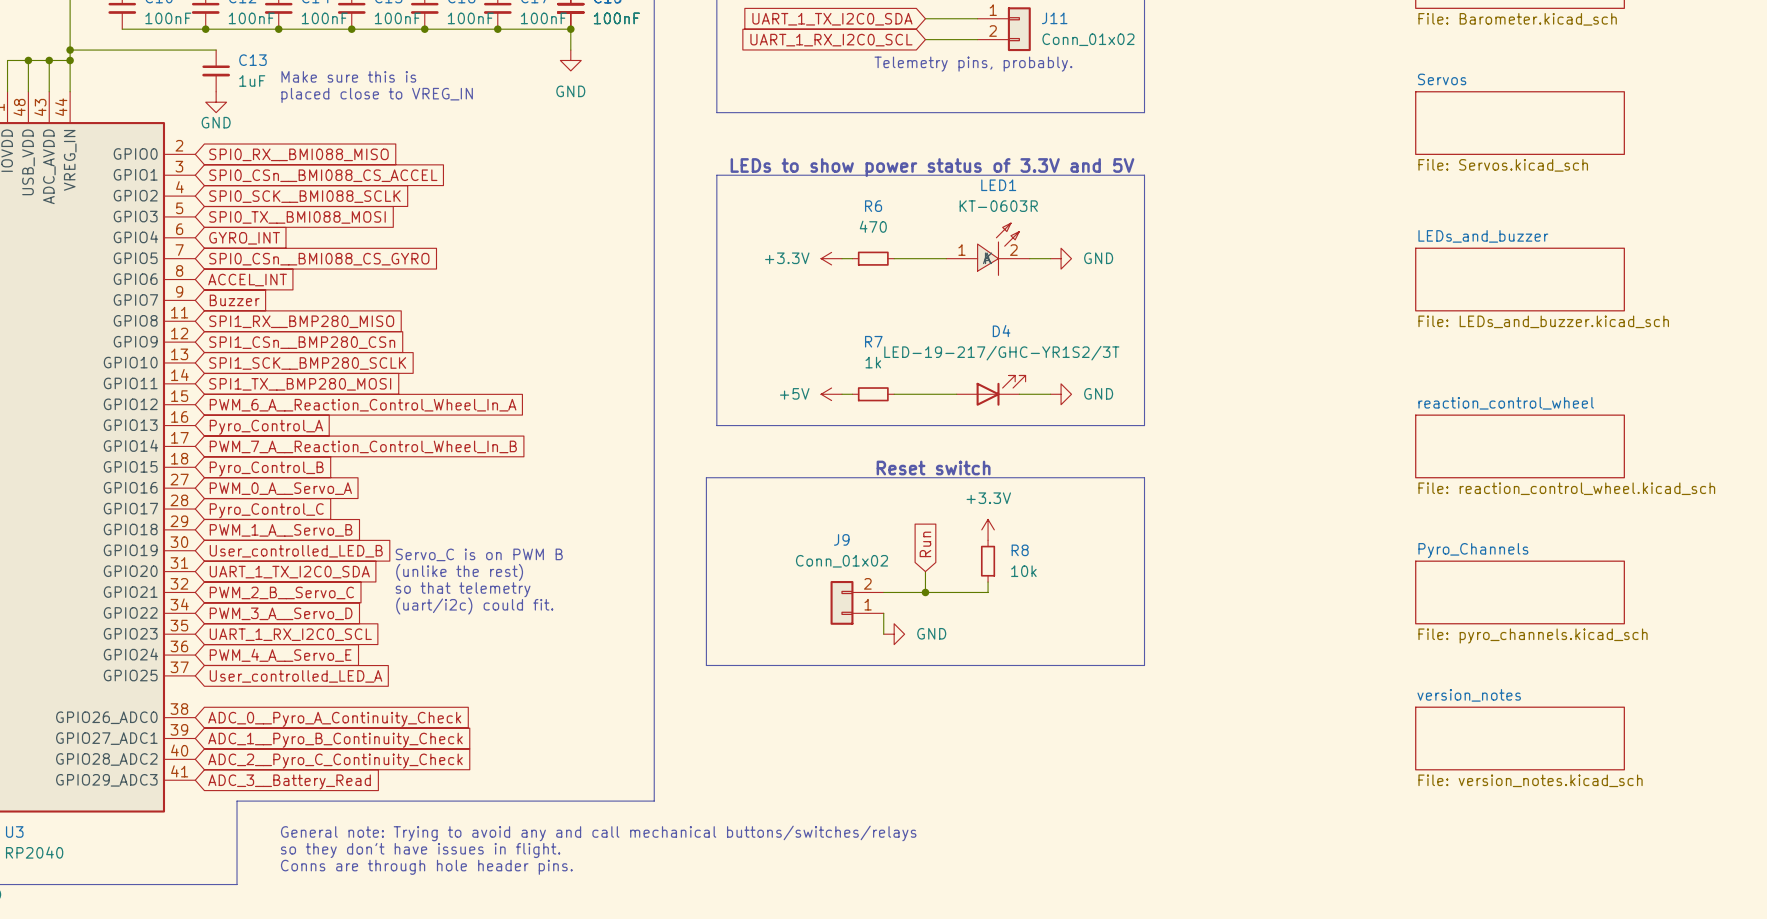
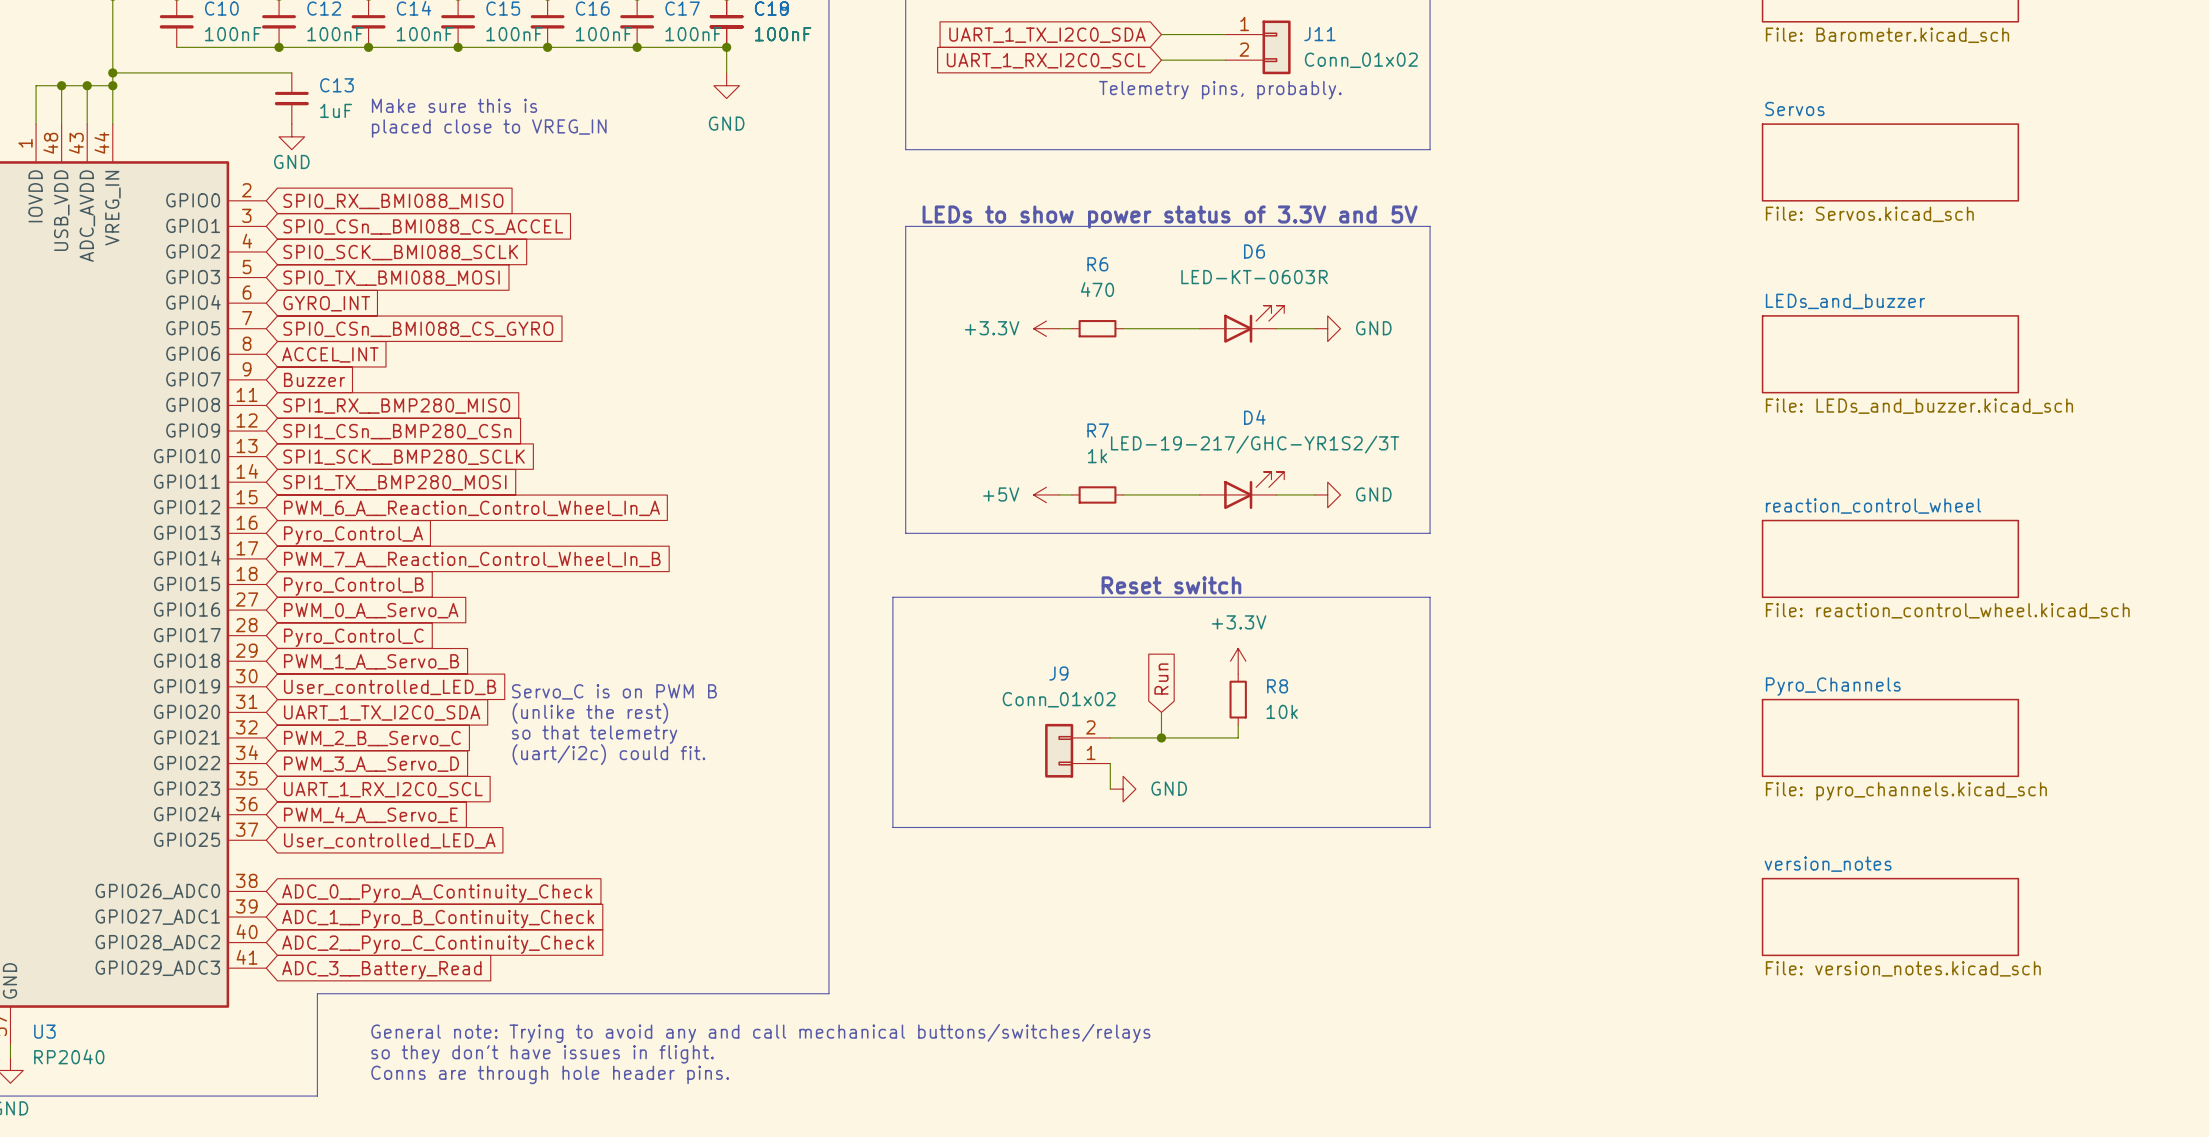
LED1: KT-0603R (988, 249) -> none
D6: none -> LED-KT-0603R (1242, 324)

